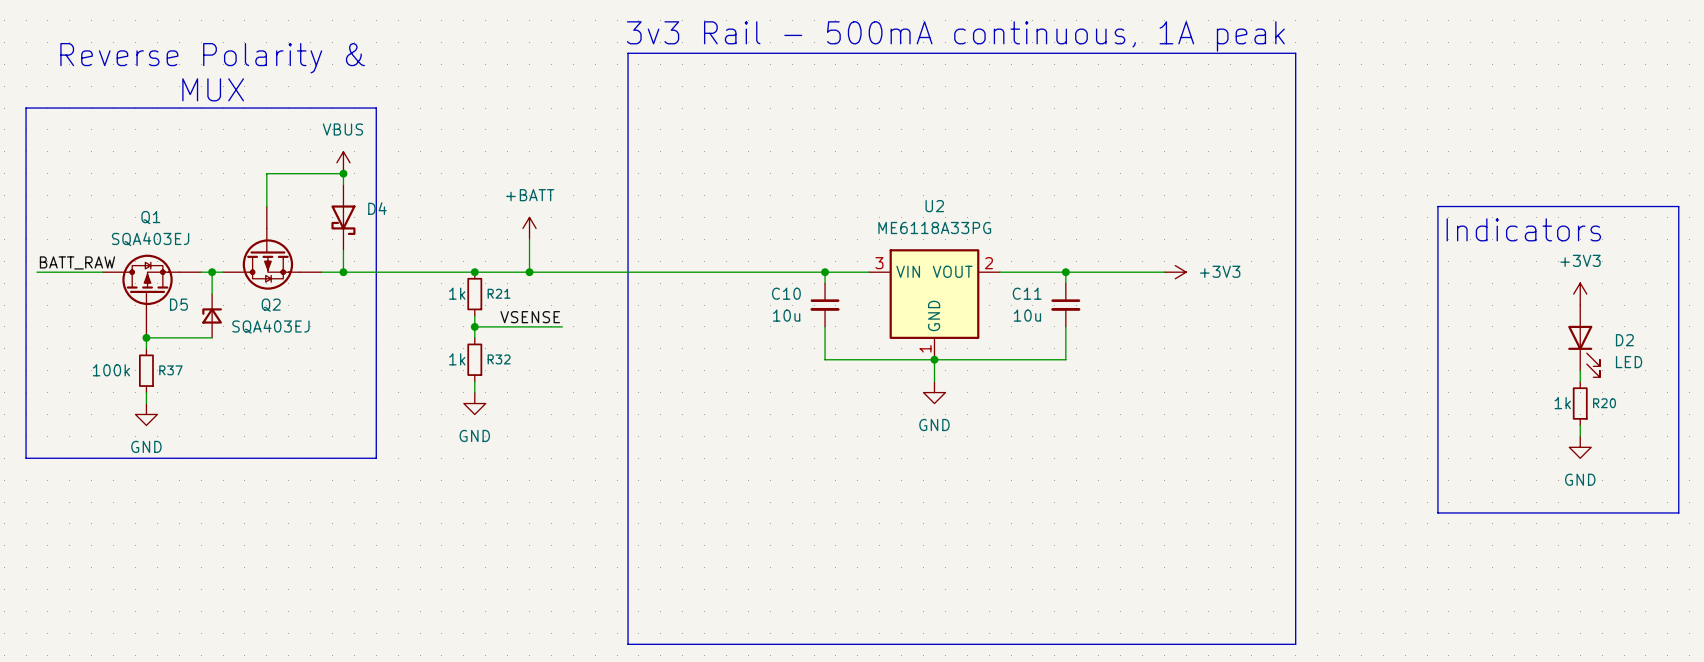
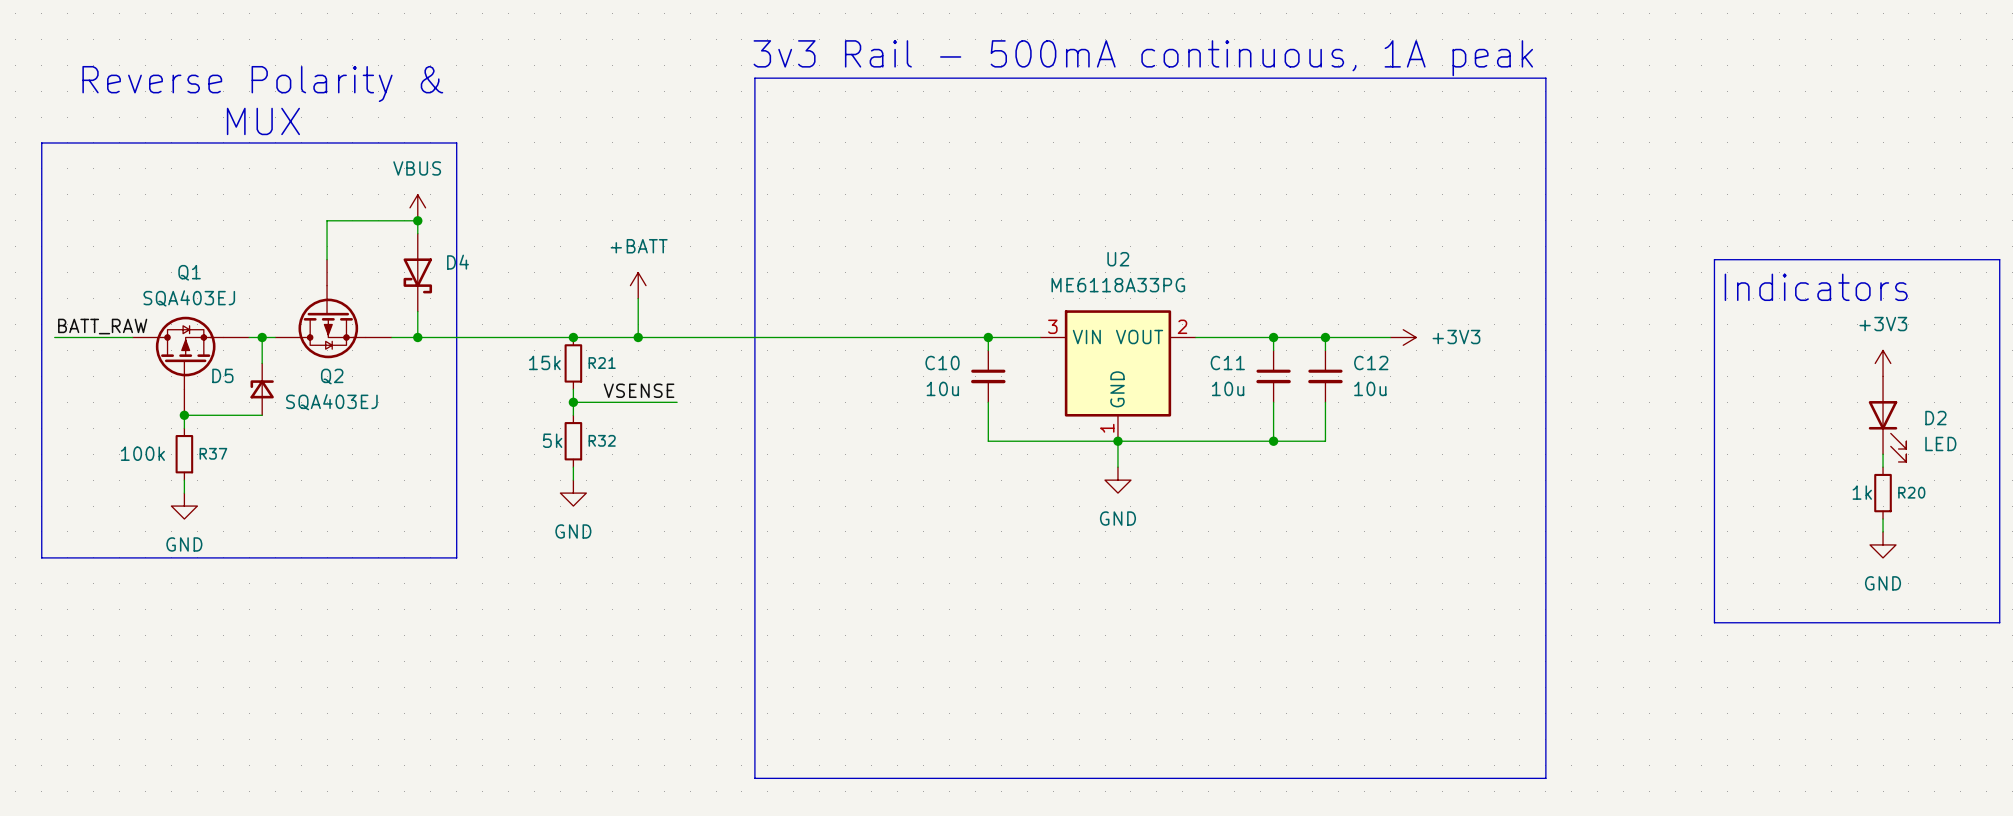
wire: none -> (1325, 337) (1325, 350)
junction: none -> (1325, 337)
R21 value: 1k (457, 293) -> 15k (544, 362)
C12: none -> 10u (1325, 376)
wire: none -> (1325, 402) (1325, 441) (1273, 441)
R32 value: 1k (457, 359) -> 5k (552, 440)
junction: none -> (1273, 441)

